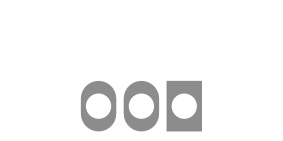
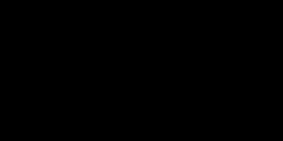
part: (141, 106) -> none

